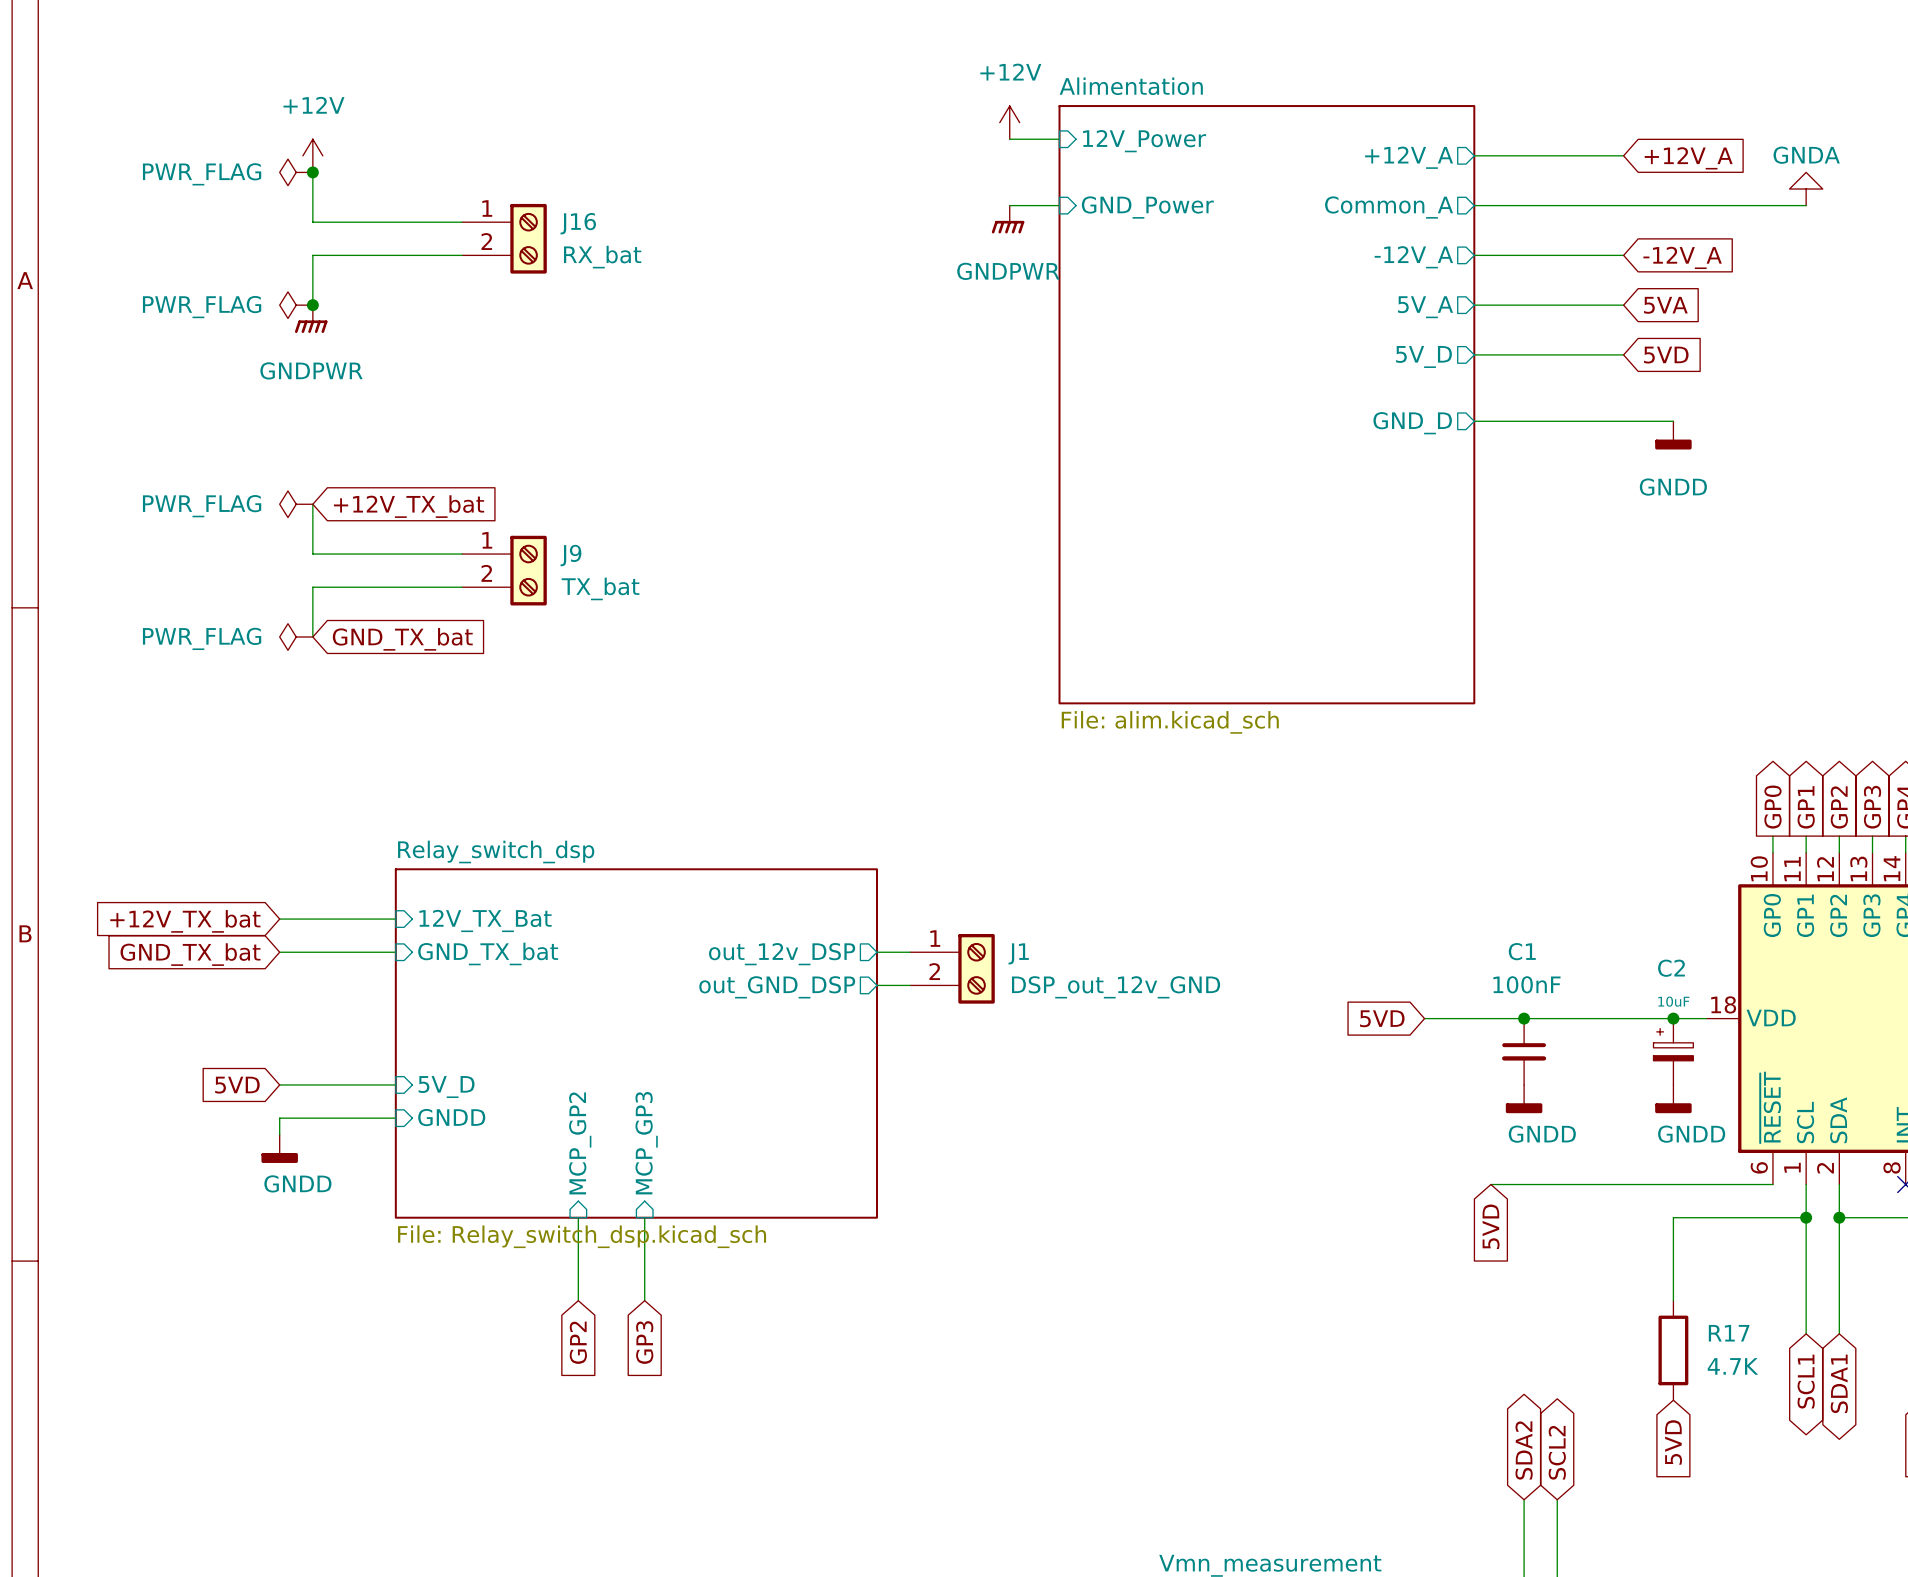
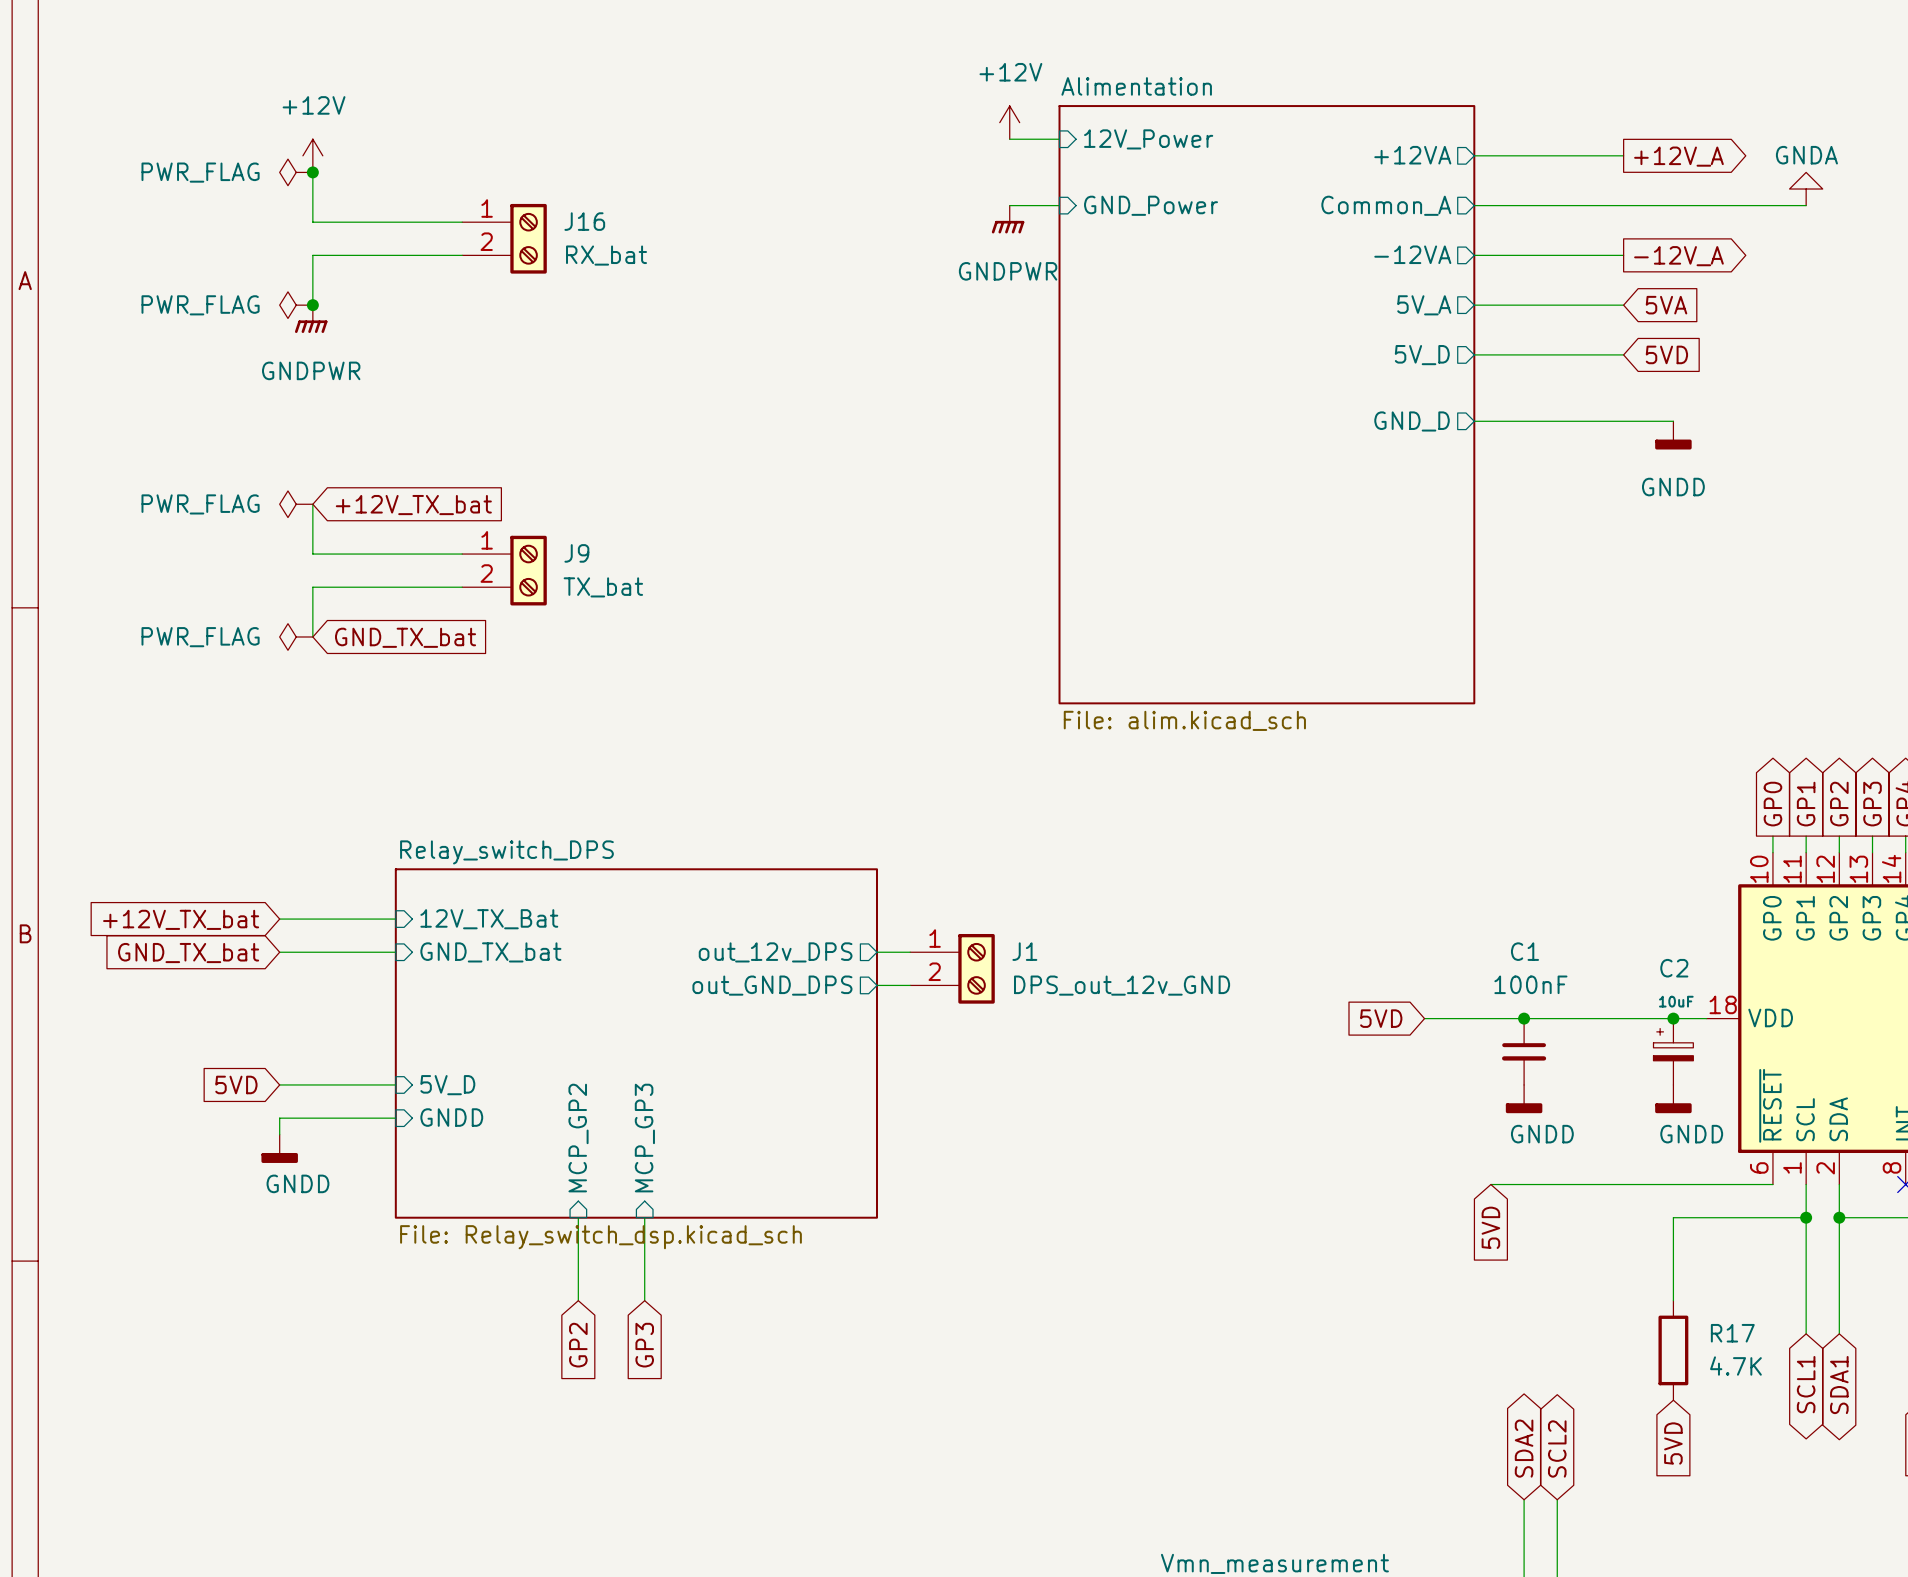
sheet pin: +12V_A (1409, 157) -> +12VA (1412, 155)
global label shape: input (1688, 158) -> output (1678, 156)
sheet pin: -12V_A (1413, 257) -> -12VA (1412, 254)
global label shape: input (1682, 257) -> output (1678, 256)
sheet Relay_switch_dsp name: Relay_switch_dsp (496, 851) -> Relay_switch_DPS (506, 852)
sheet pin: out_12v_DSP (782, 954) -> out_12v_DPS (775, 952)
sheet pin: out_GND_DSP (777, 987) -> out_GND_DPS (772, 985)
J1 value: DSP_out_12v_GND (1116, 987) -> DPS_out_12v_GND (1122, 985)

